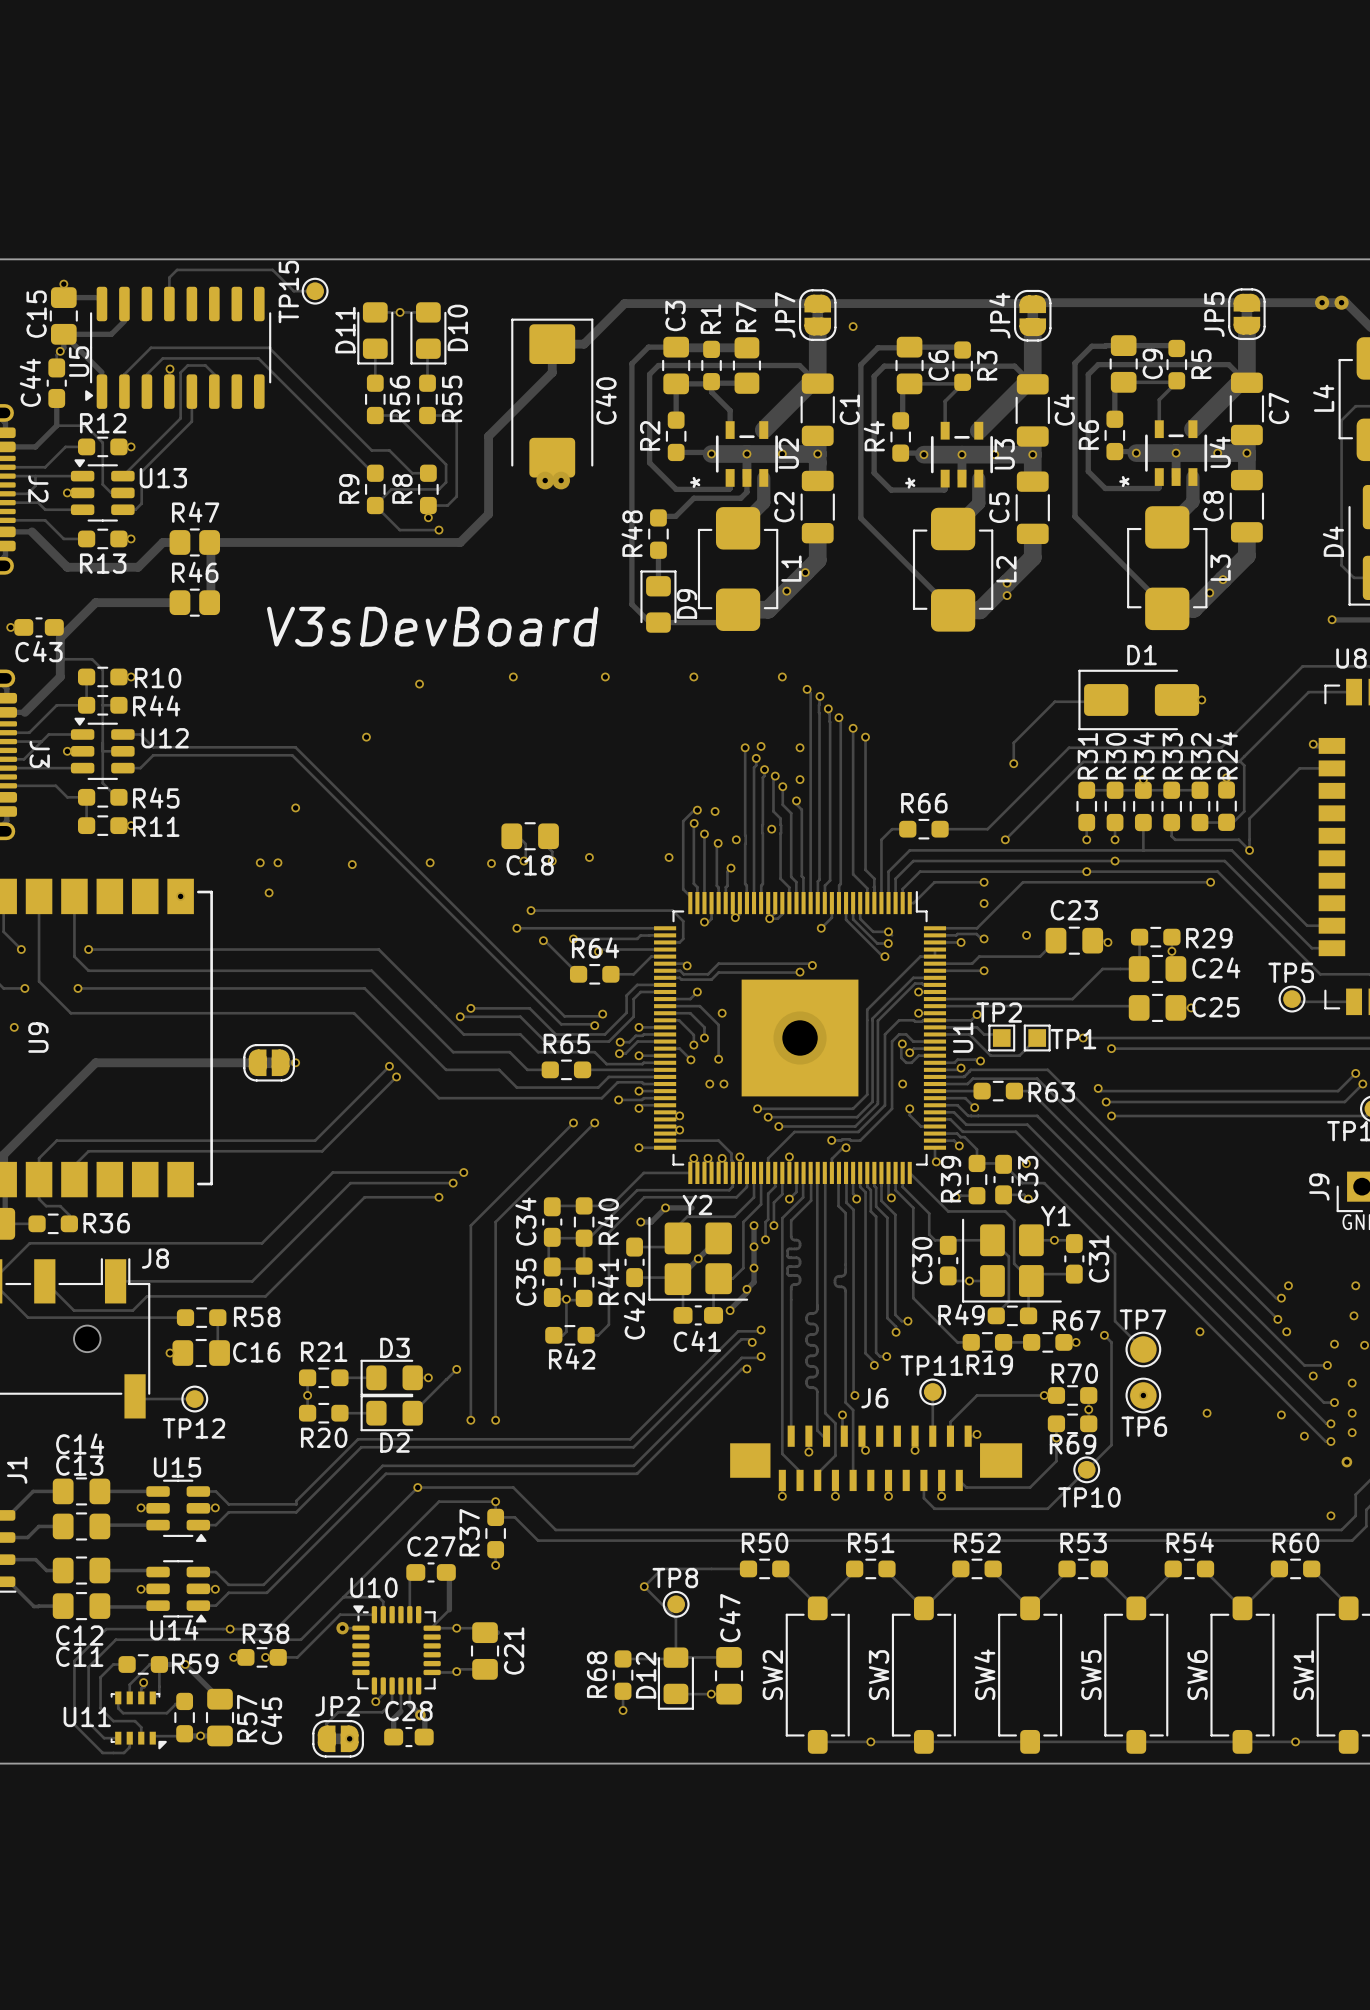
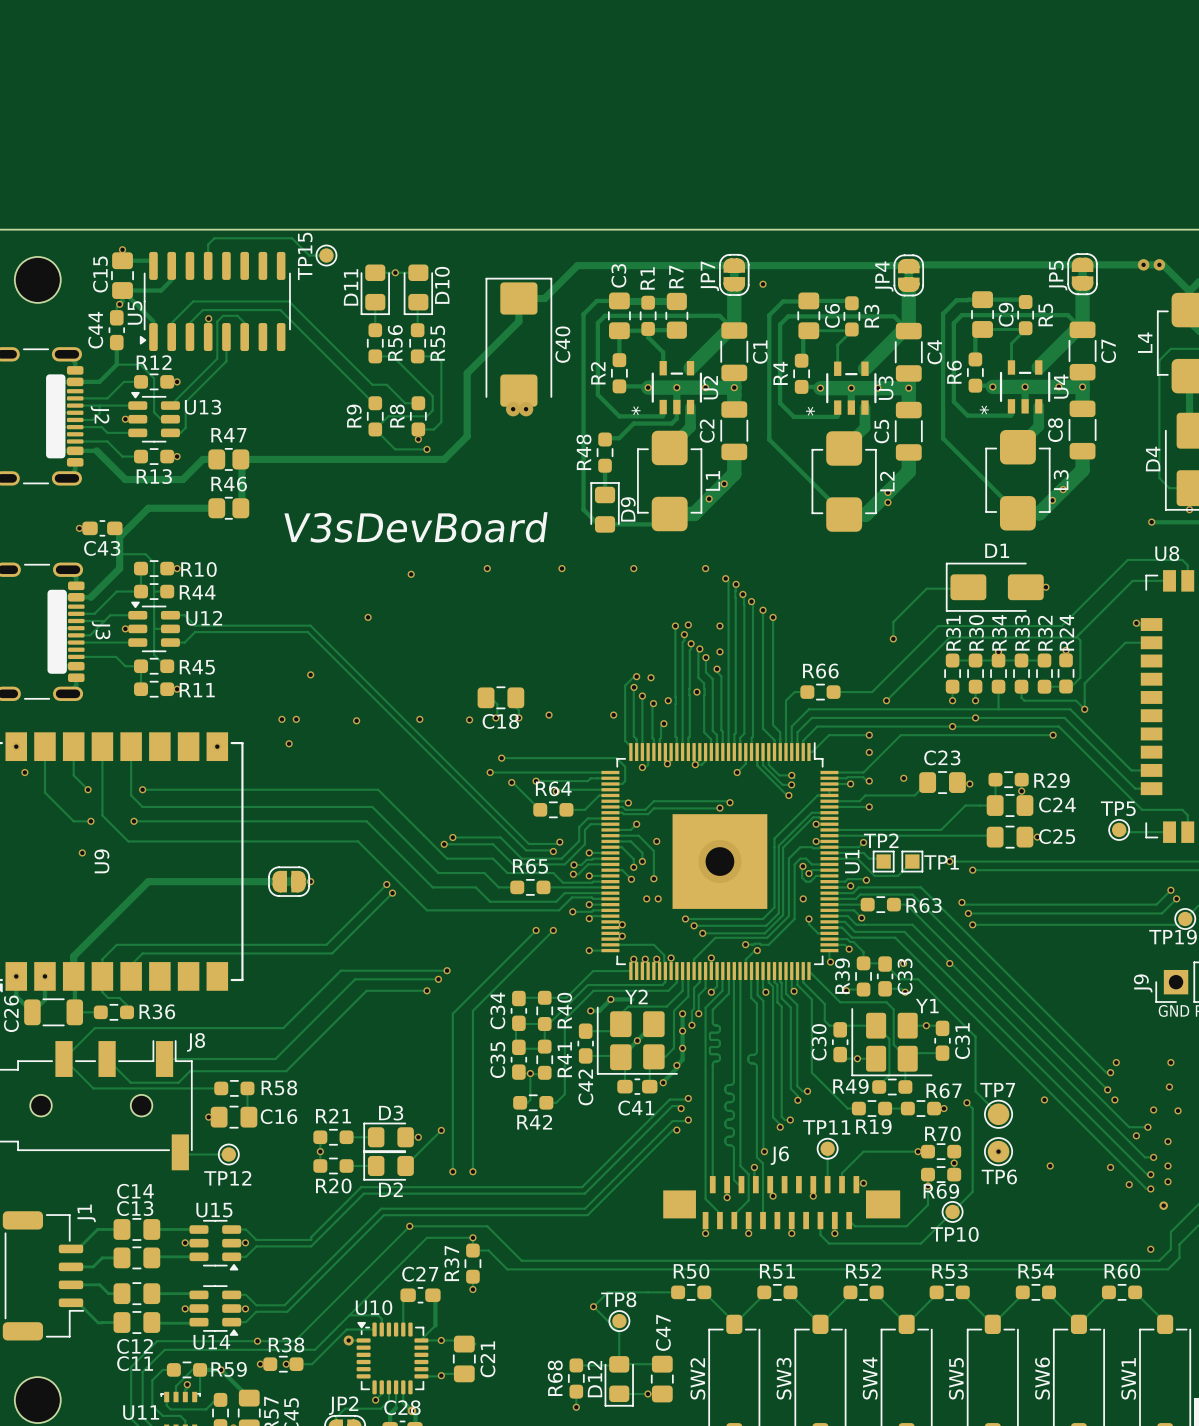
via: none -> (949, 963)

